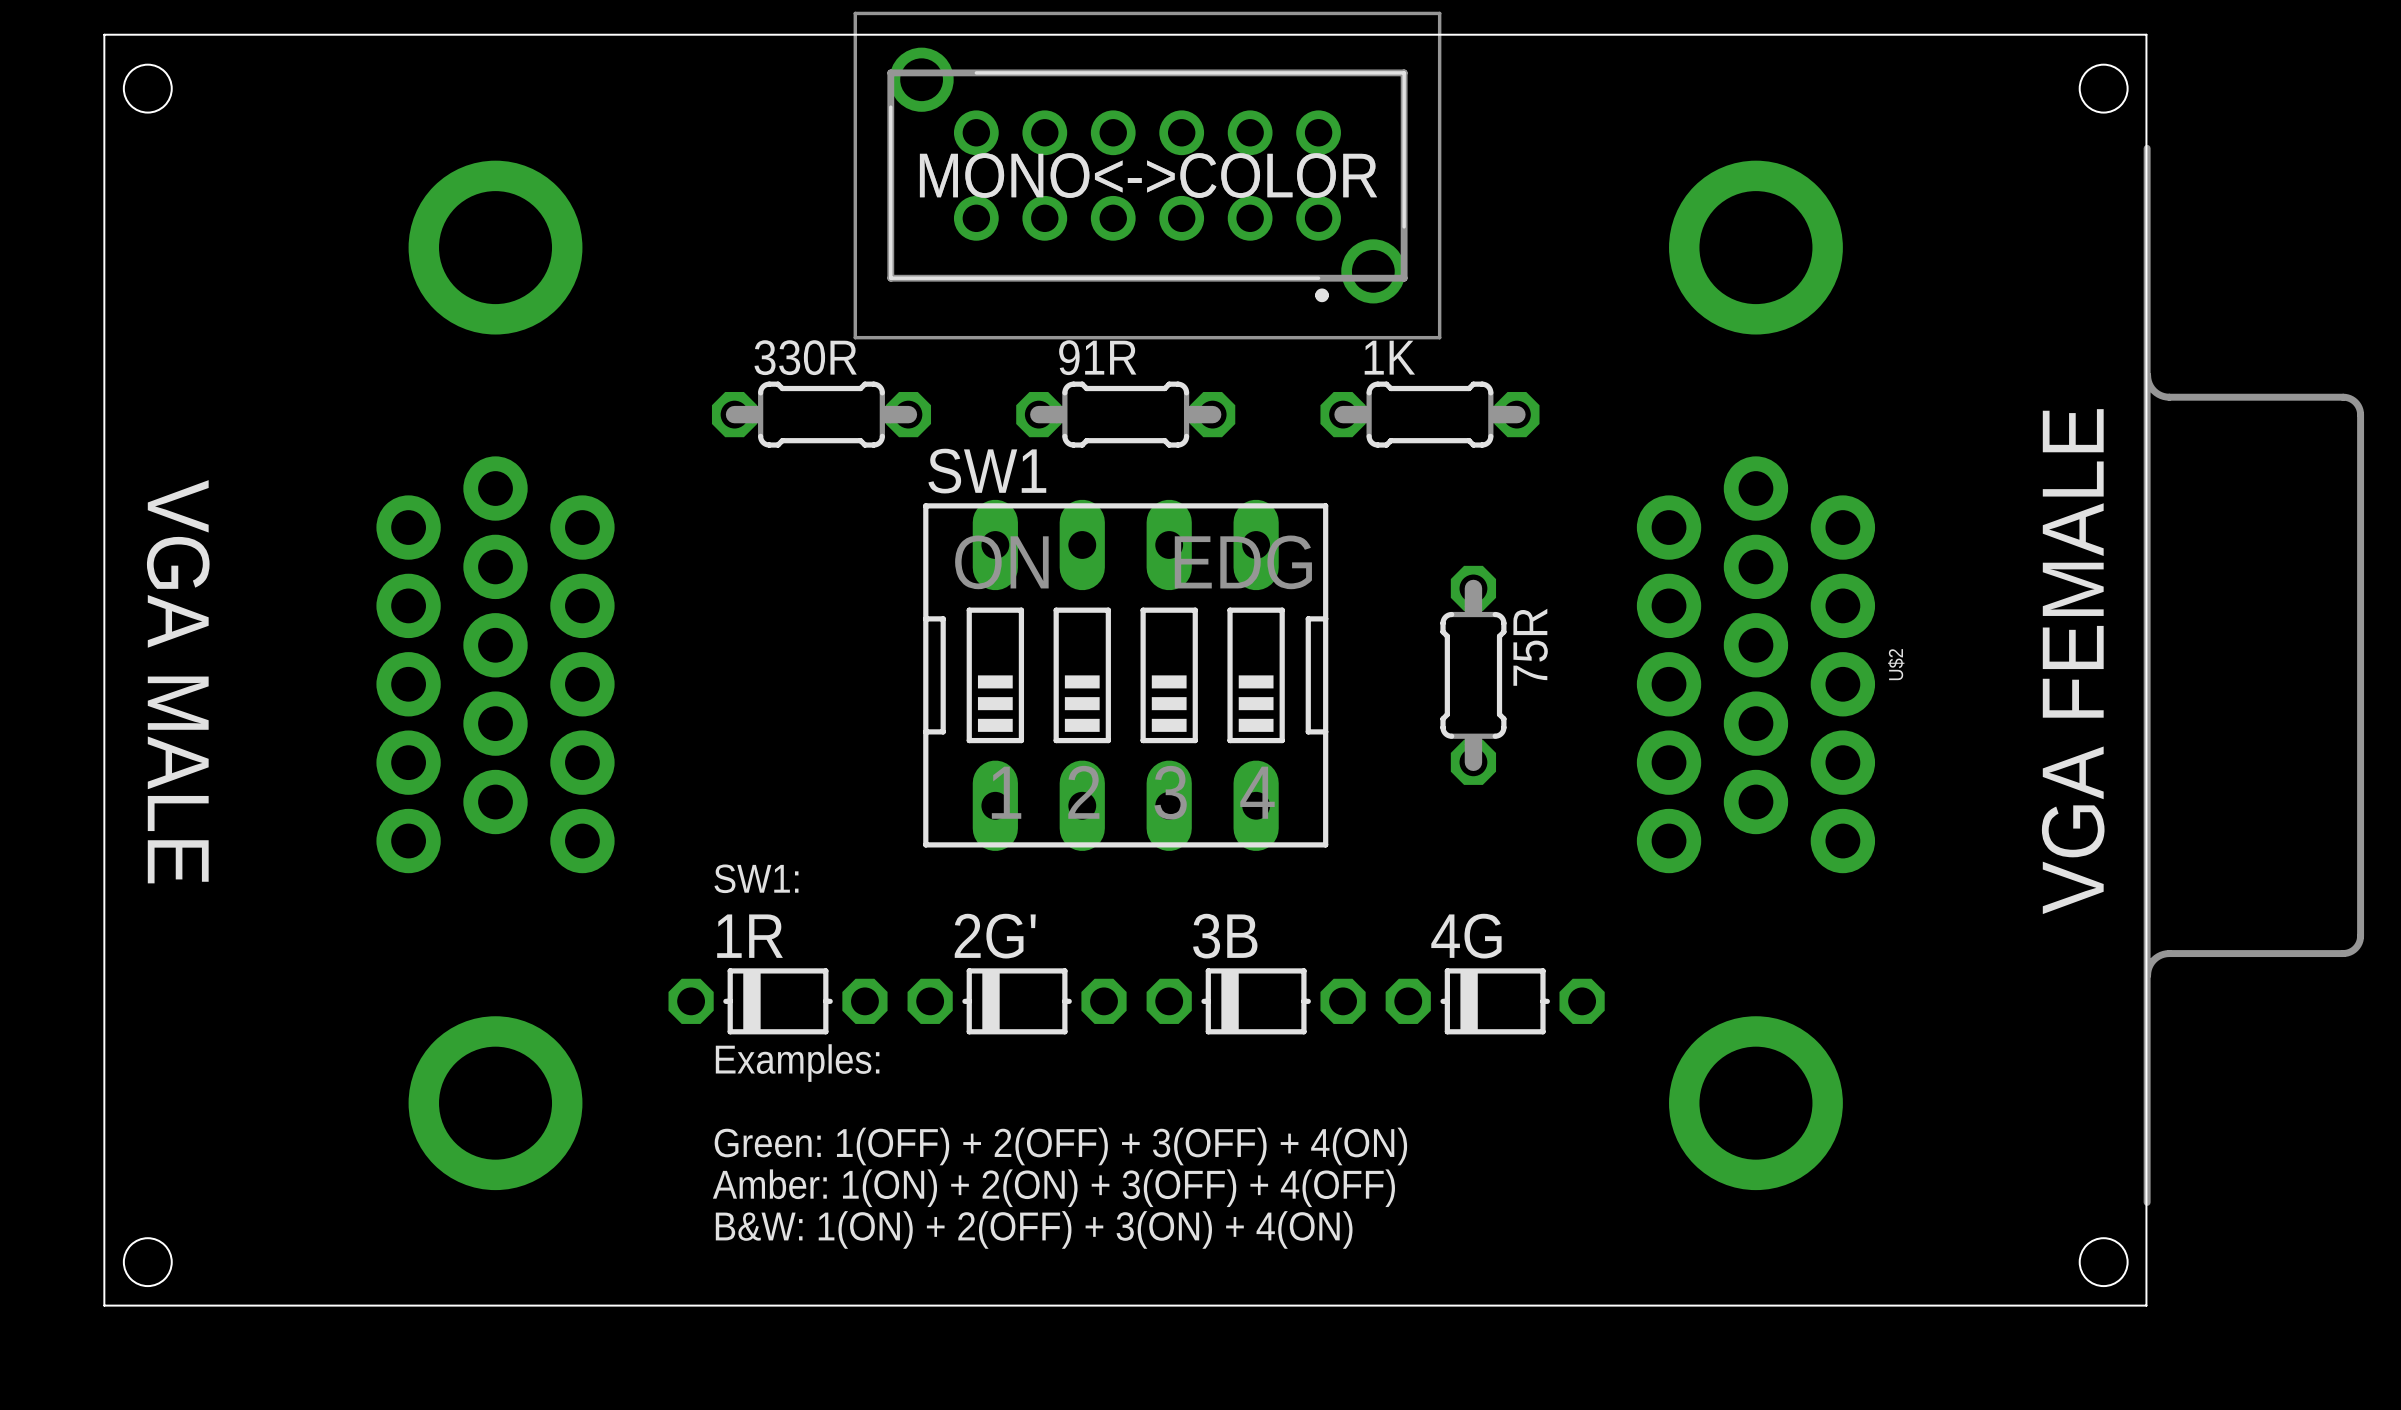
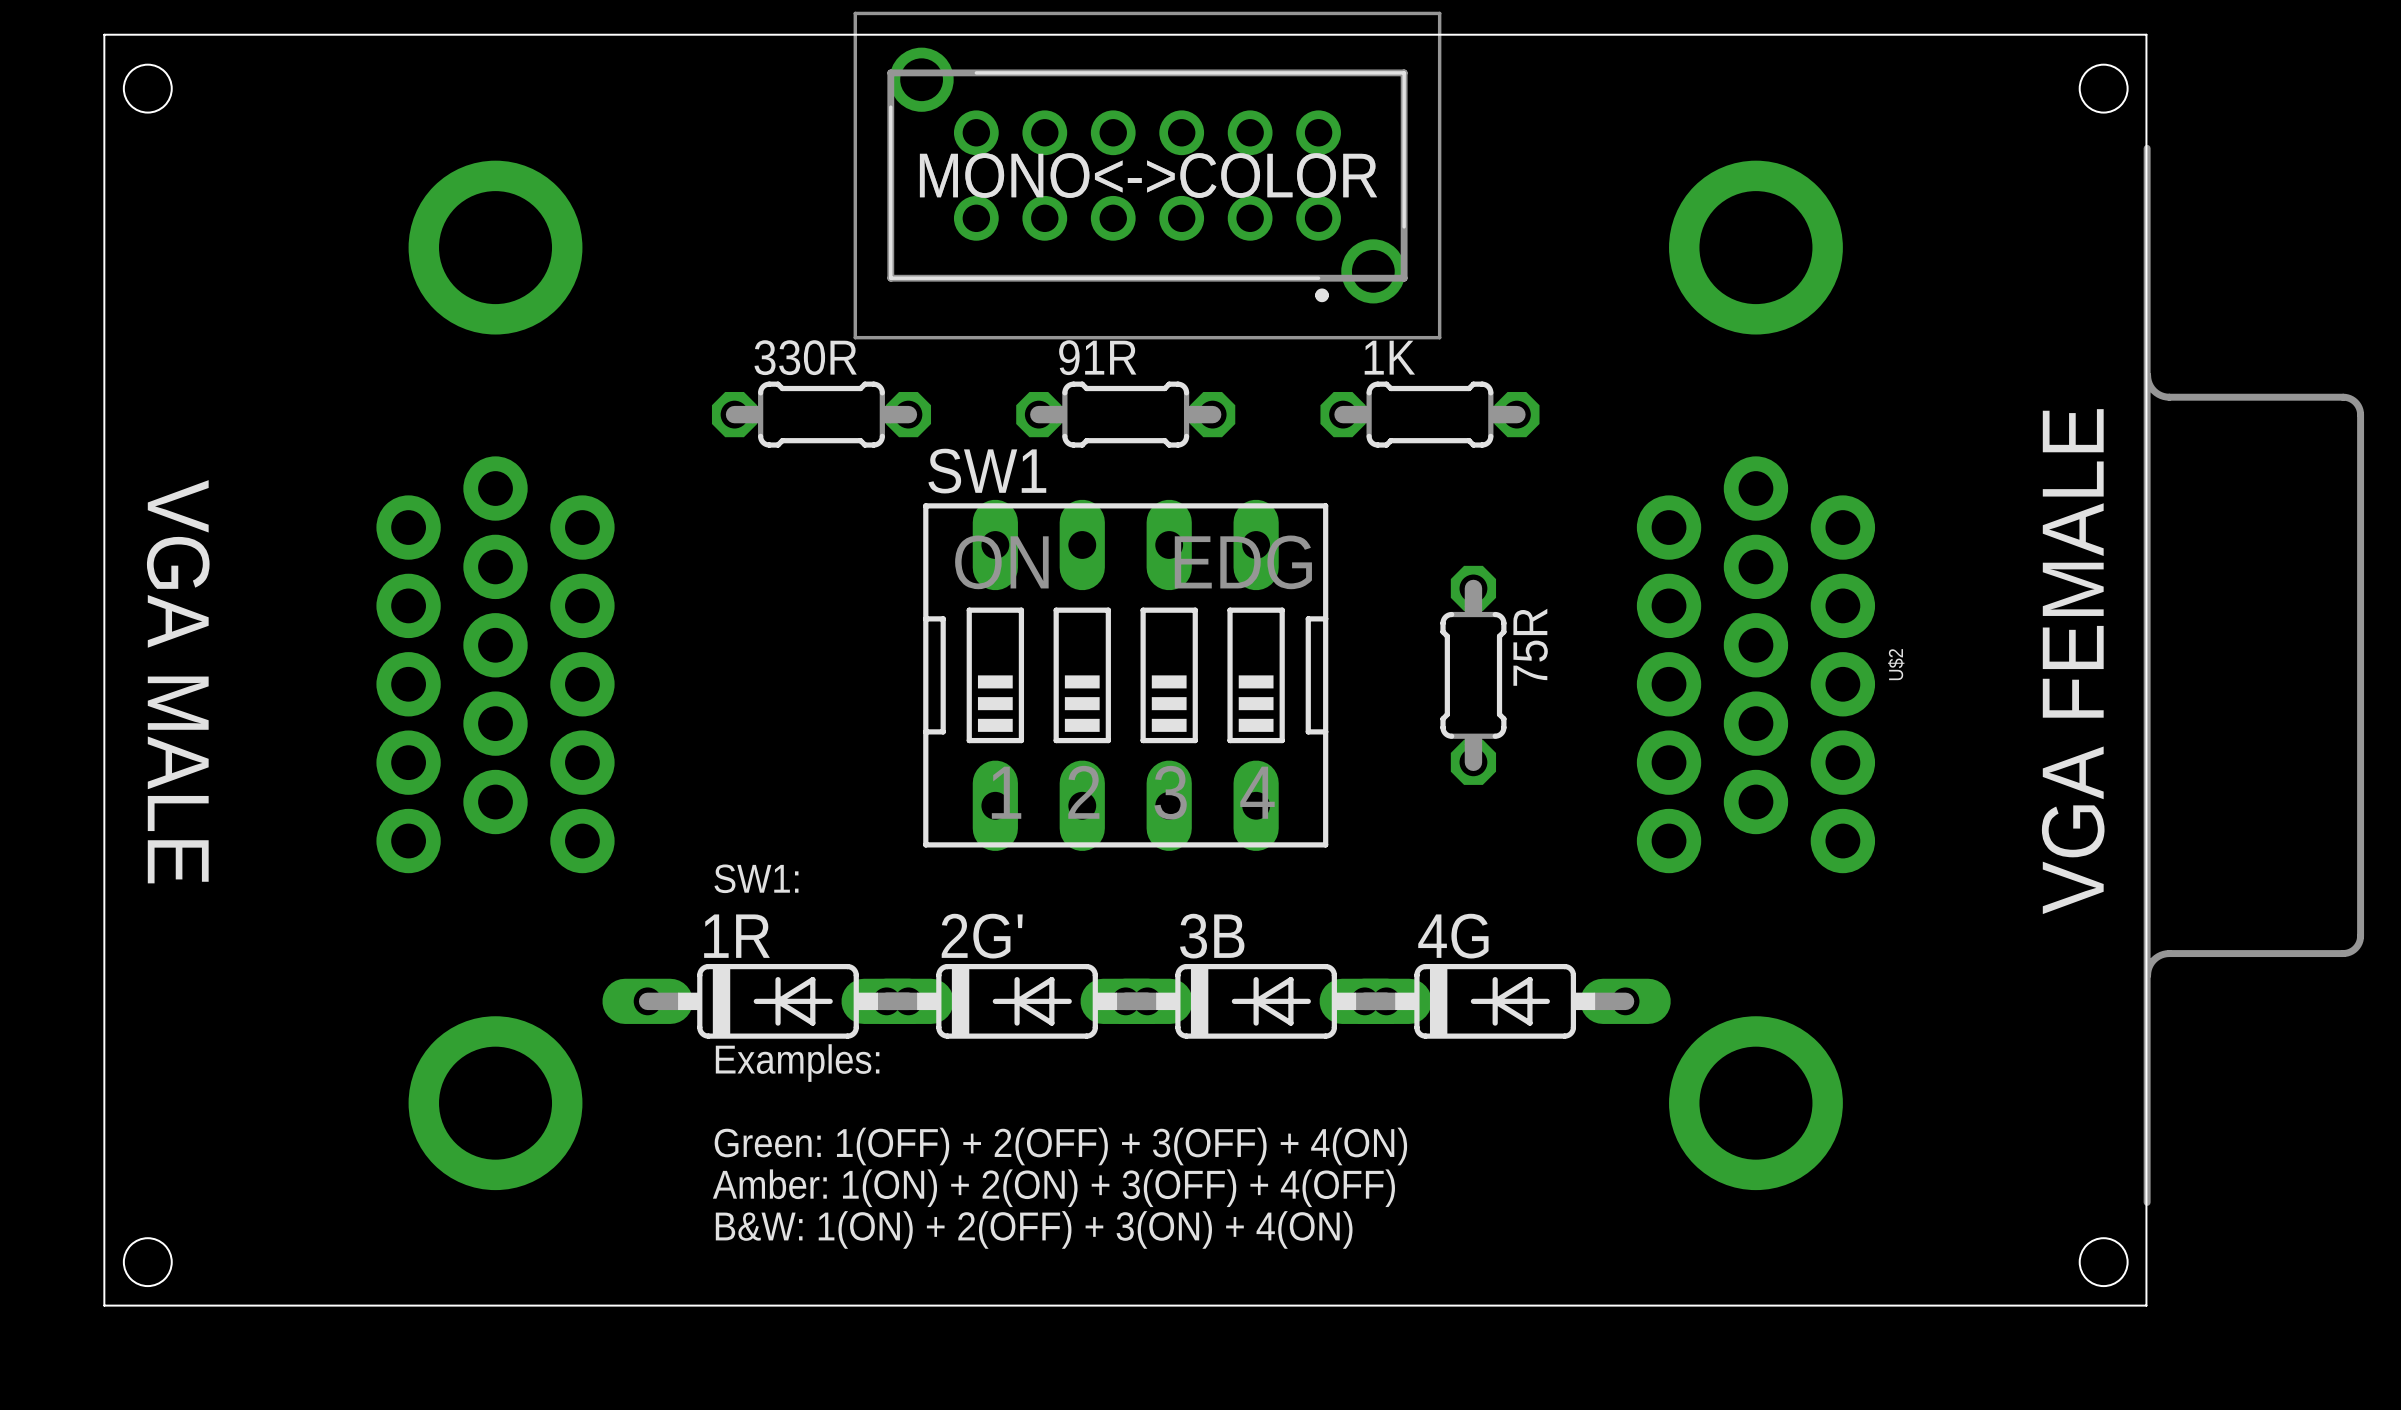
1R footprint: [668, 968, 888, 1035] -> [602, 963, 954, 1039]
2G' footprint: [907, 968, 1127, 1035] -> [841, 963, 1193, 1039]
3B footprint: [1146, 968, 1366, 1035] -> [1080, 963, 1432, 1039]
4G footprint: [1385, 968, 1605, 1035] -> [1319, 963, 1671, 1039]

